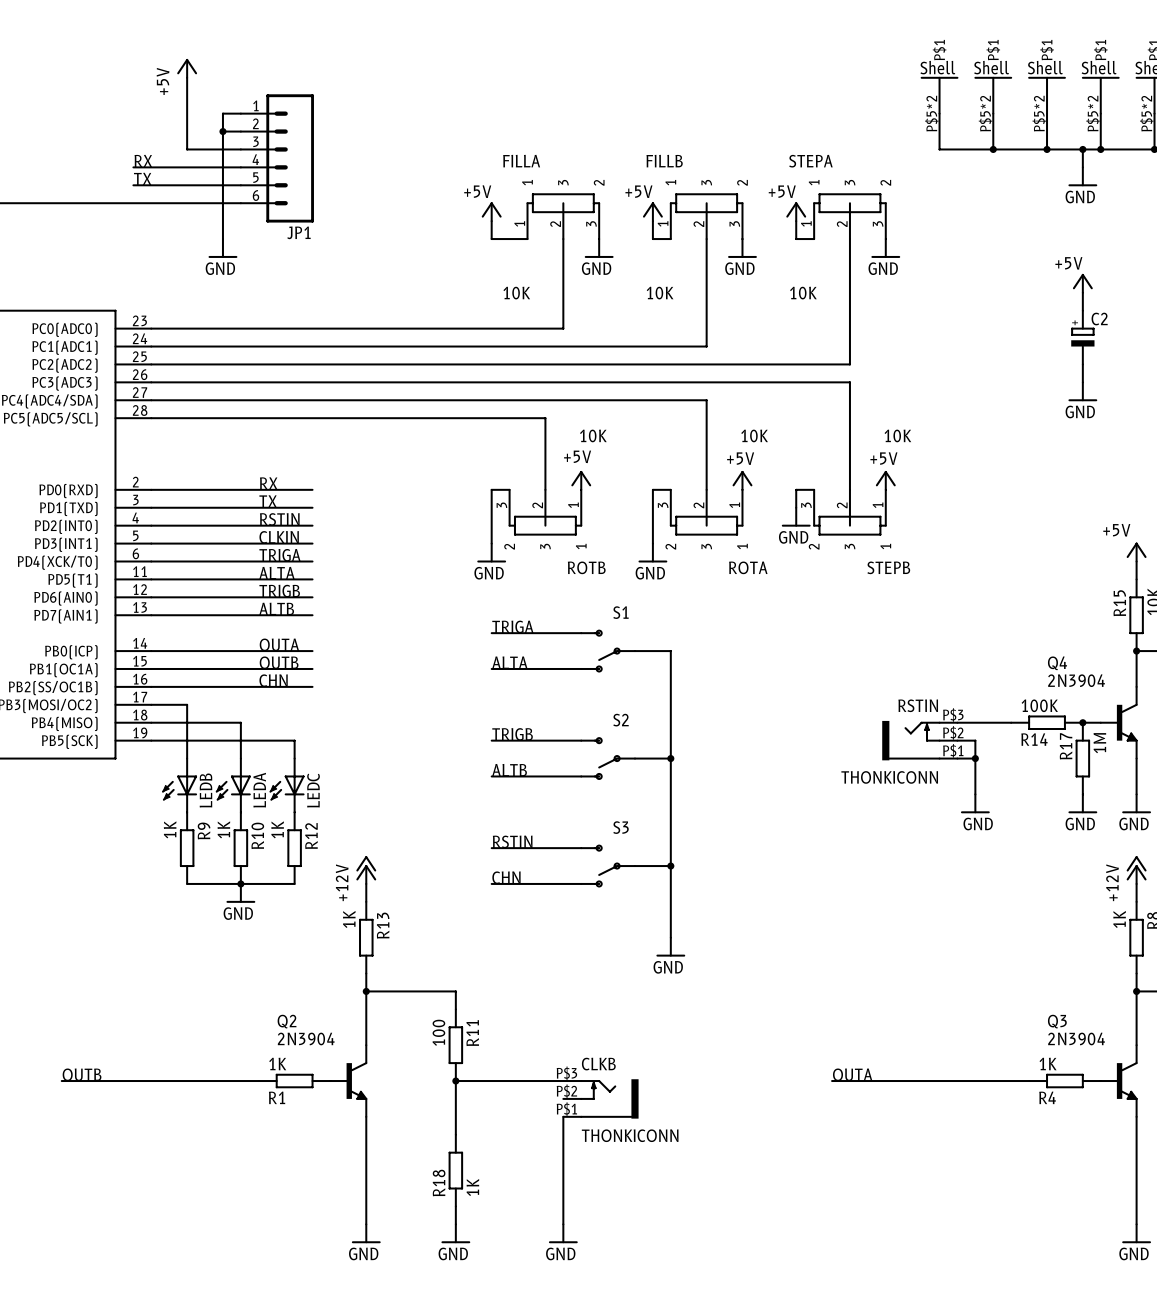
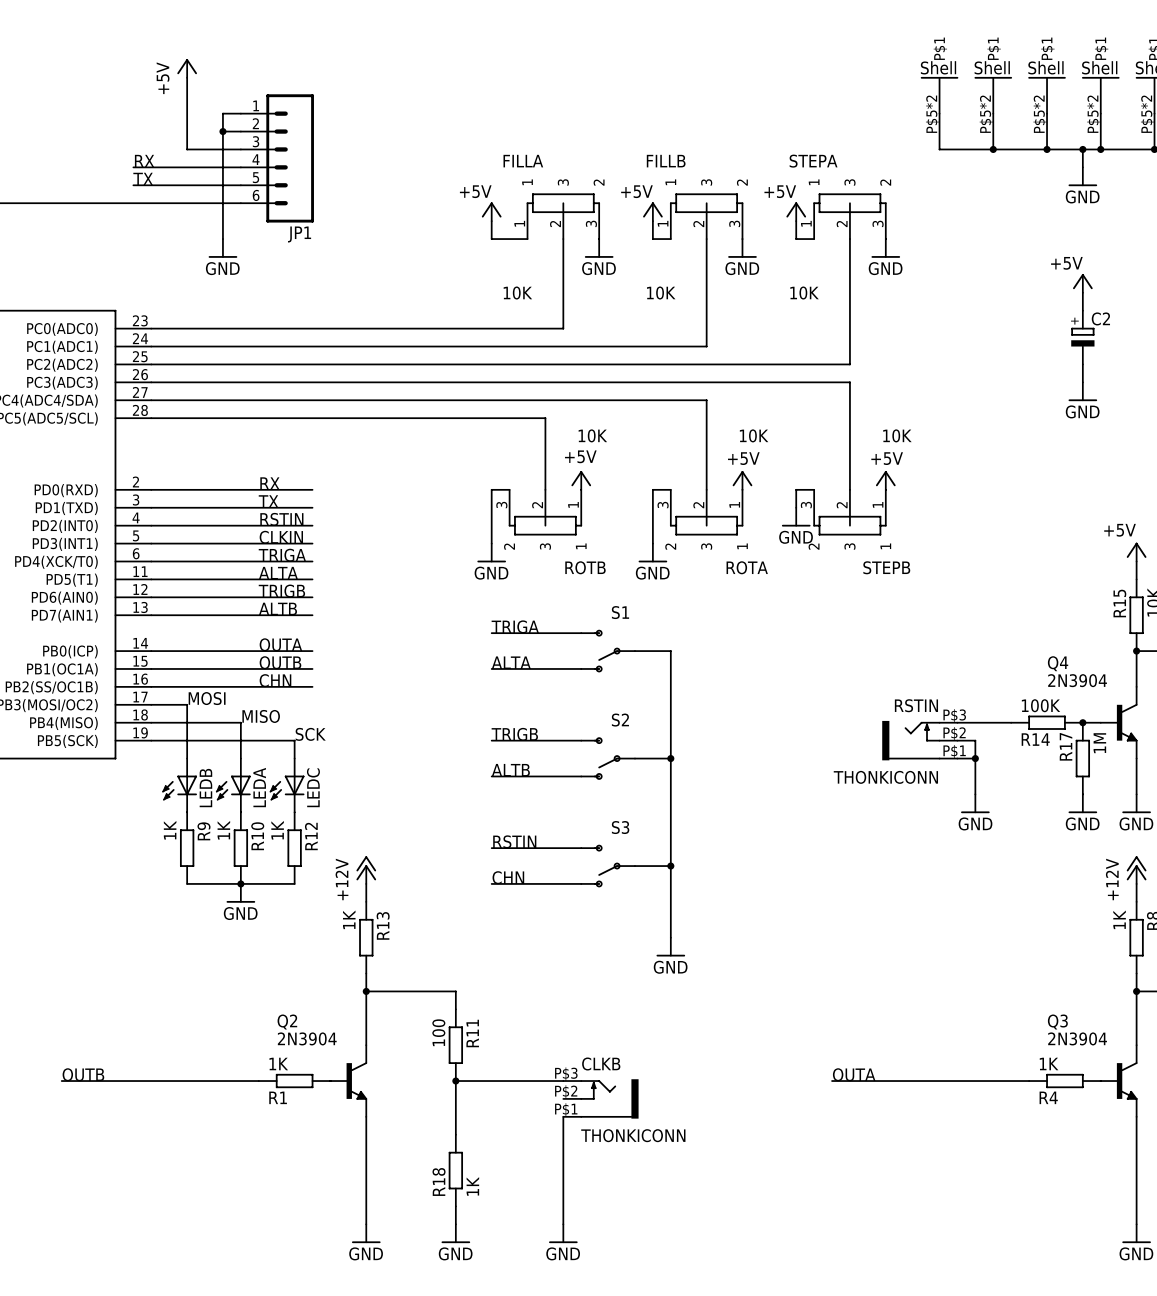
label: none -> MOSI (207, 698)
label: none -> MISO (261, 716)
label: none -> SCK (310, 734)

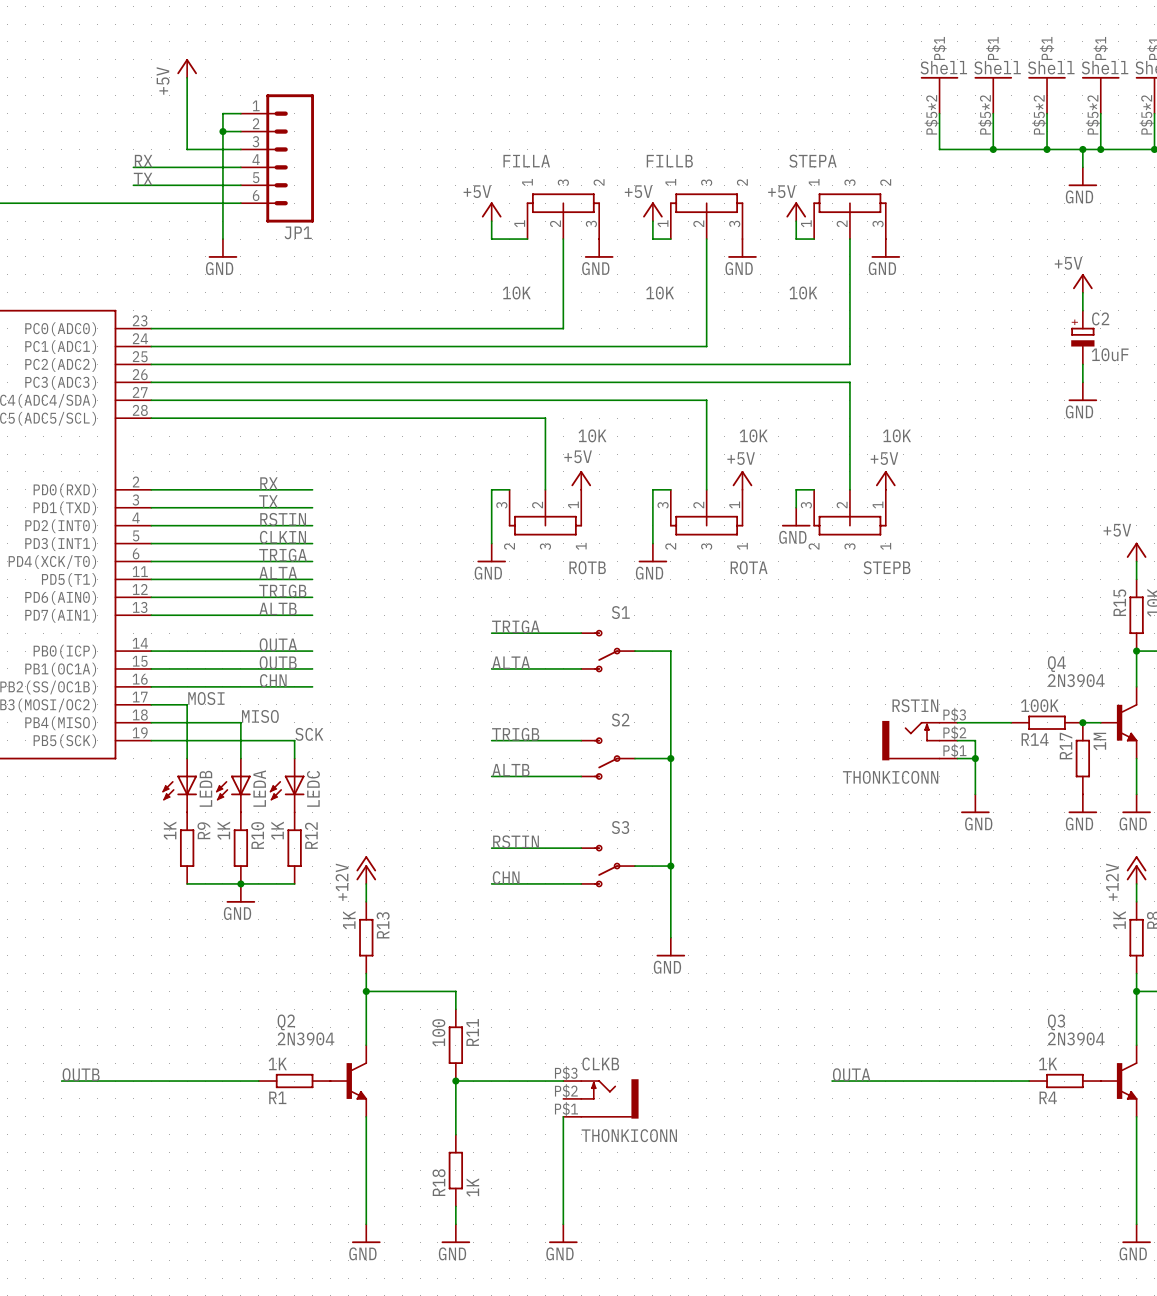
C2 value: none -> 10uF (1110, 354)

